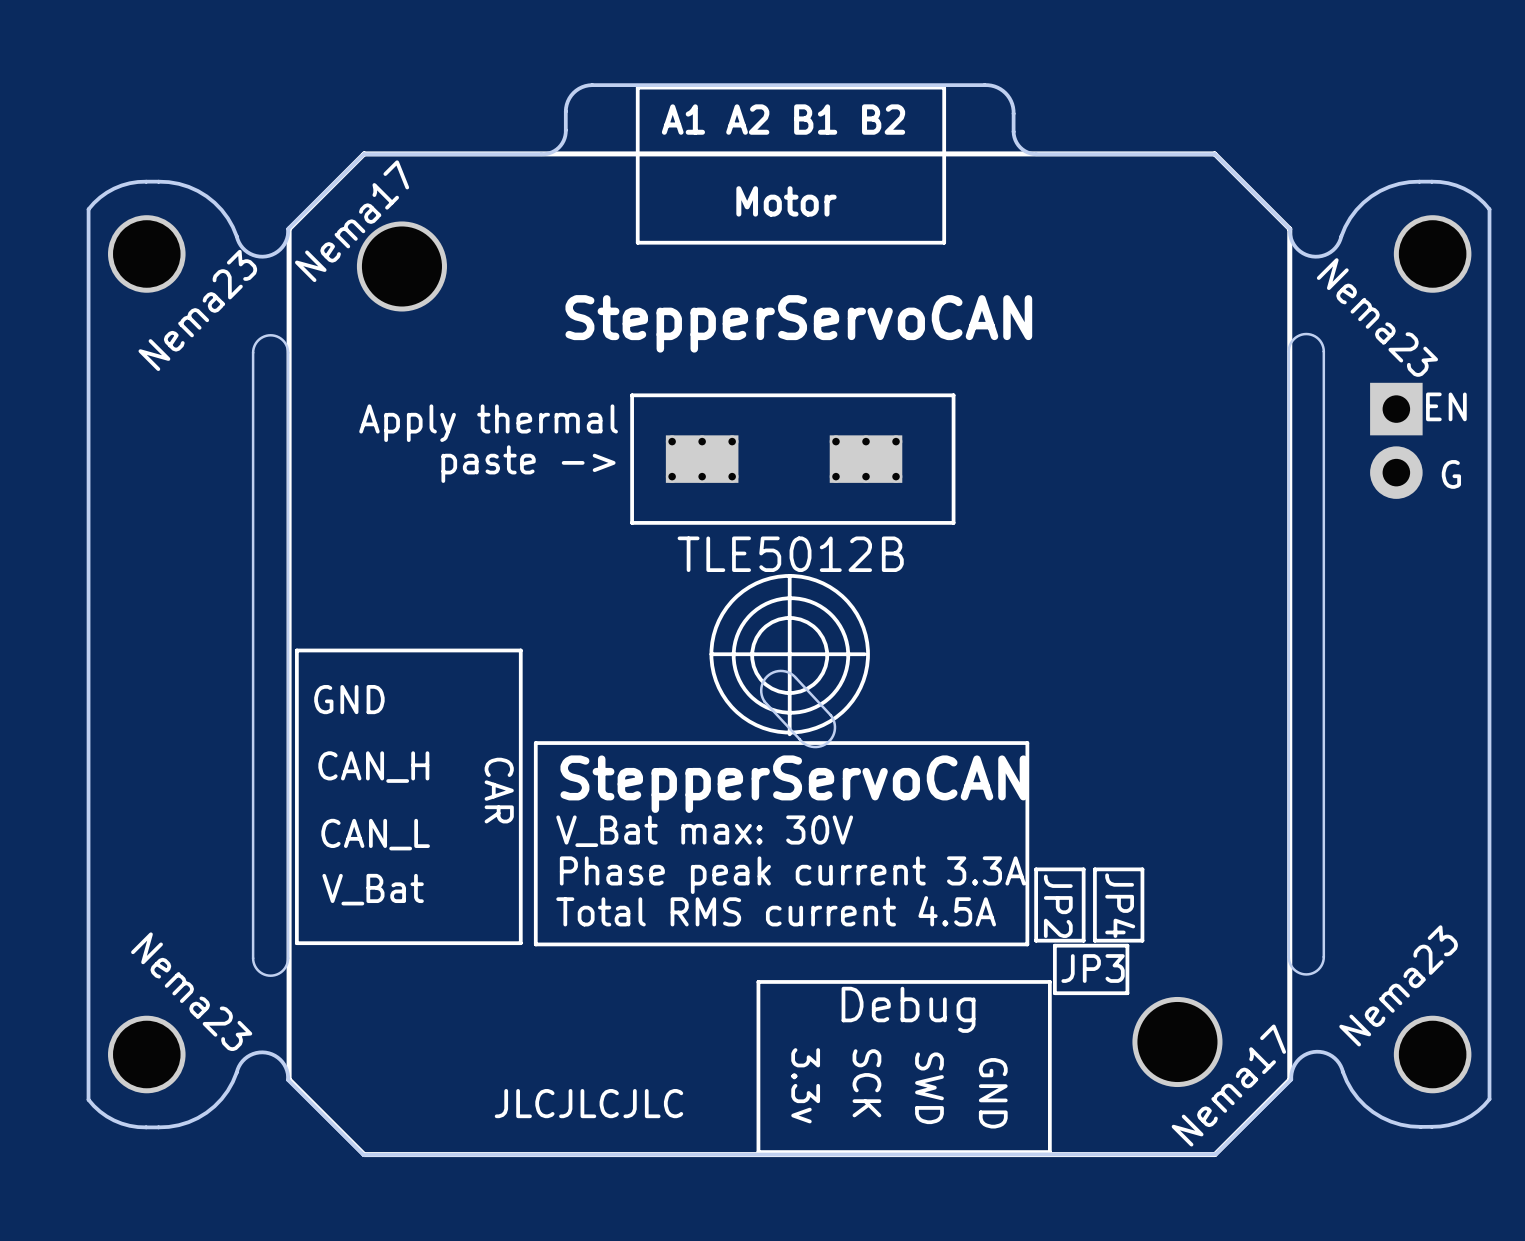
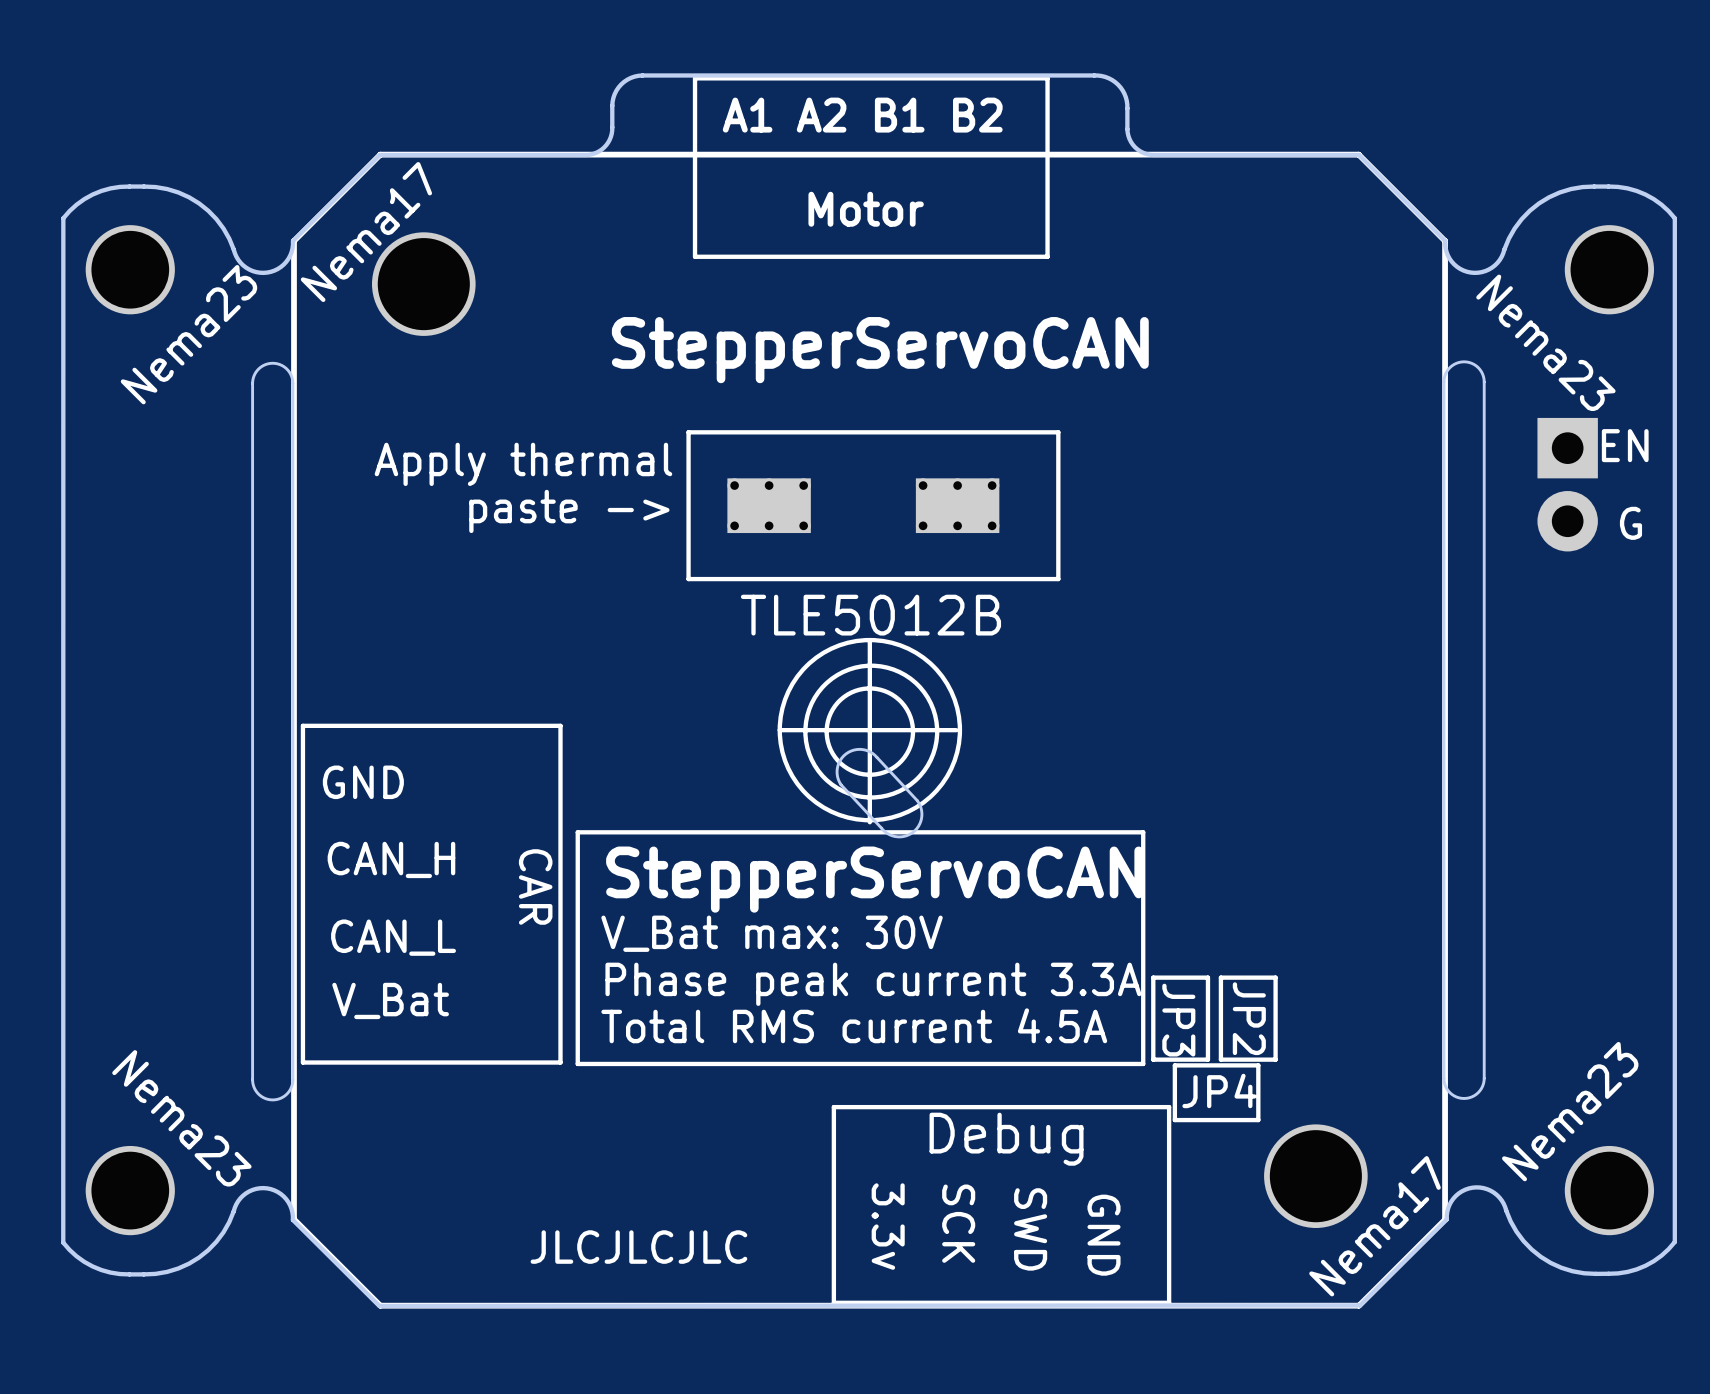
JP4 name: JP4 (1120, 905) -> JP2 (1249, 1018)
JP2 name: JP2 (1058, 906) -> JP3 (1178, 1020)
JP3 name: JP3 (1093, 968) -> JP4 (1219, 1090)

